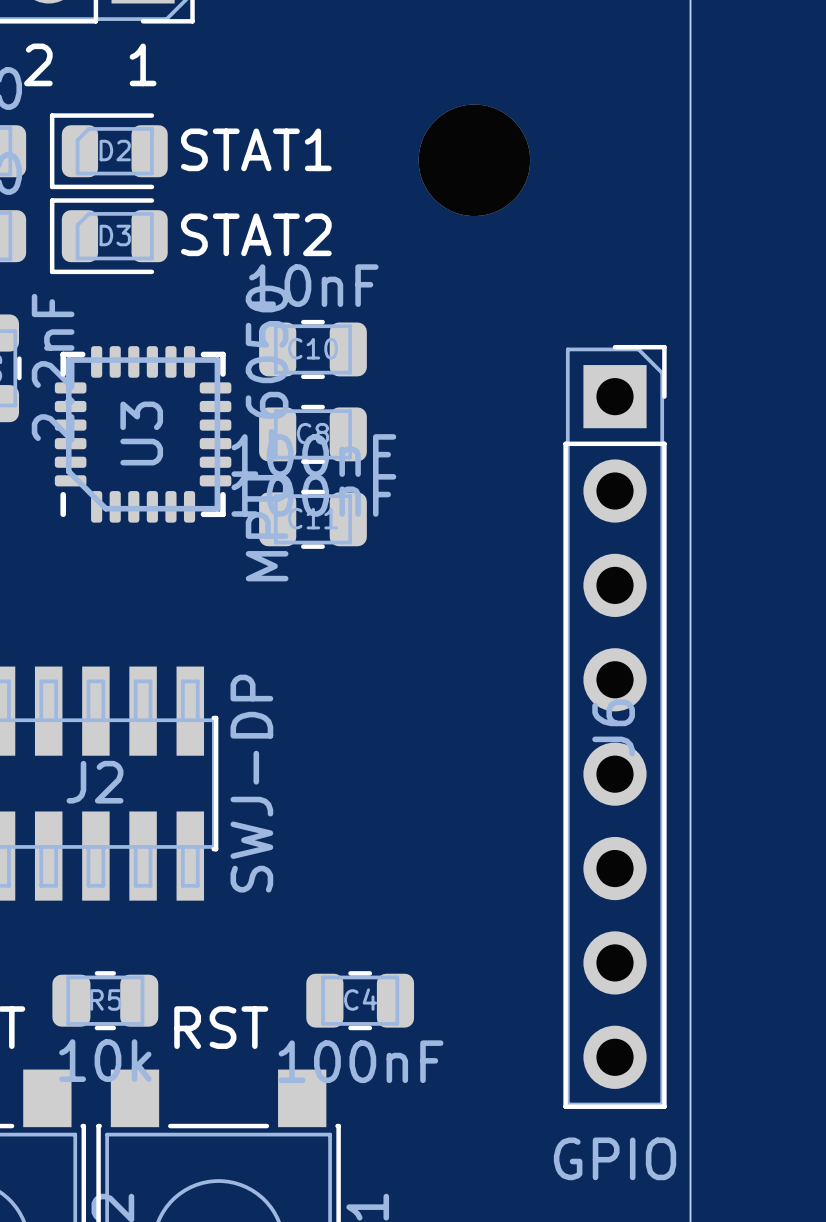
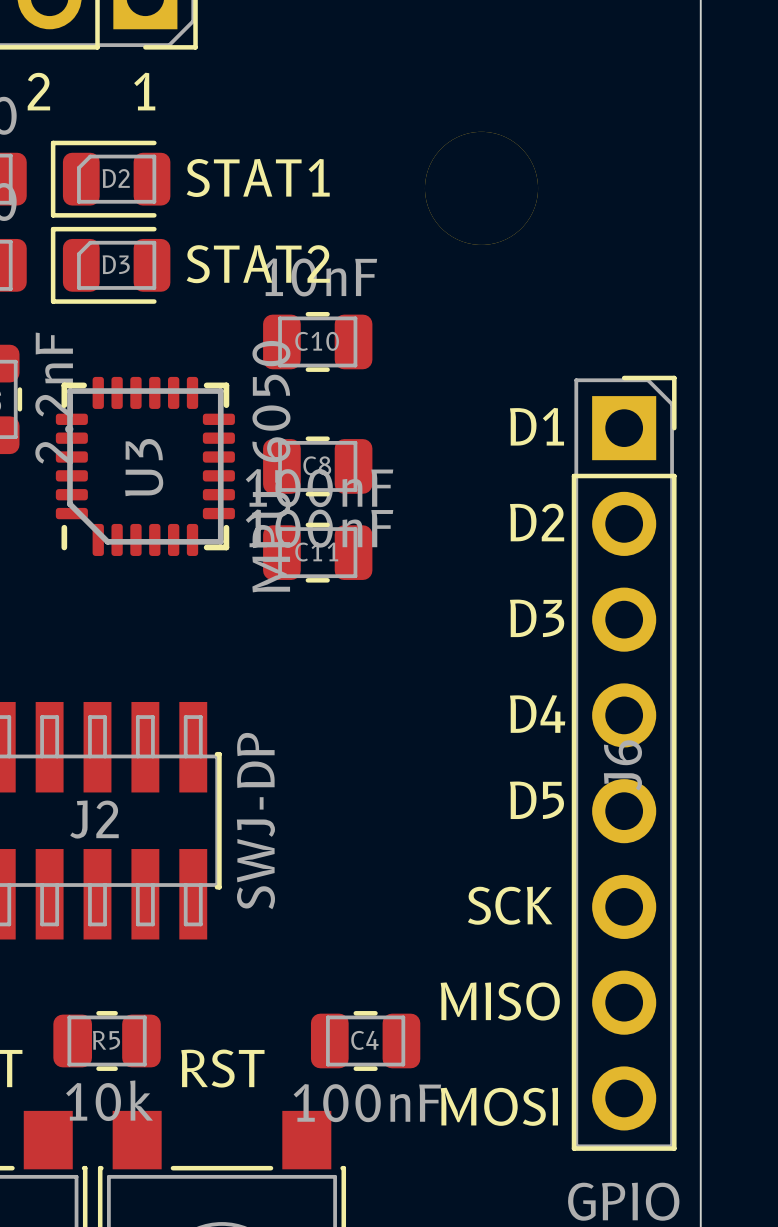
C10 position: (312, 349) -> (317, 341)
text: none -> D1 (536, 426)
text: none -> D2 (537, 522)
text: none -> D3 (537, 618)
text: none -> D4 (537, 714)
text: none -> D5 (536, 800)
text: none -> SCK (510, 905)
text: none -> MISO (500, 1001)
text: none -> MOSI (499, 1106)

